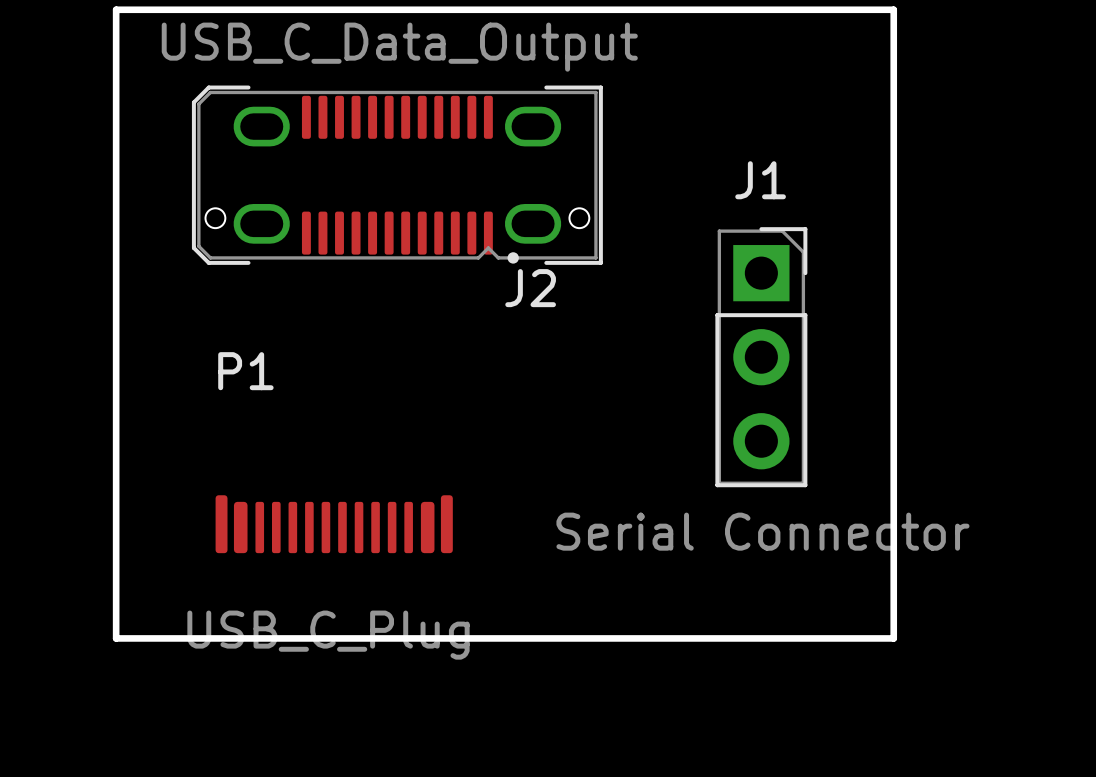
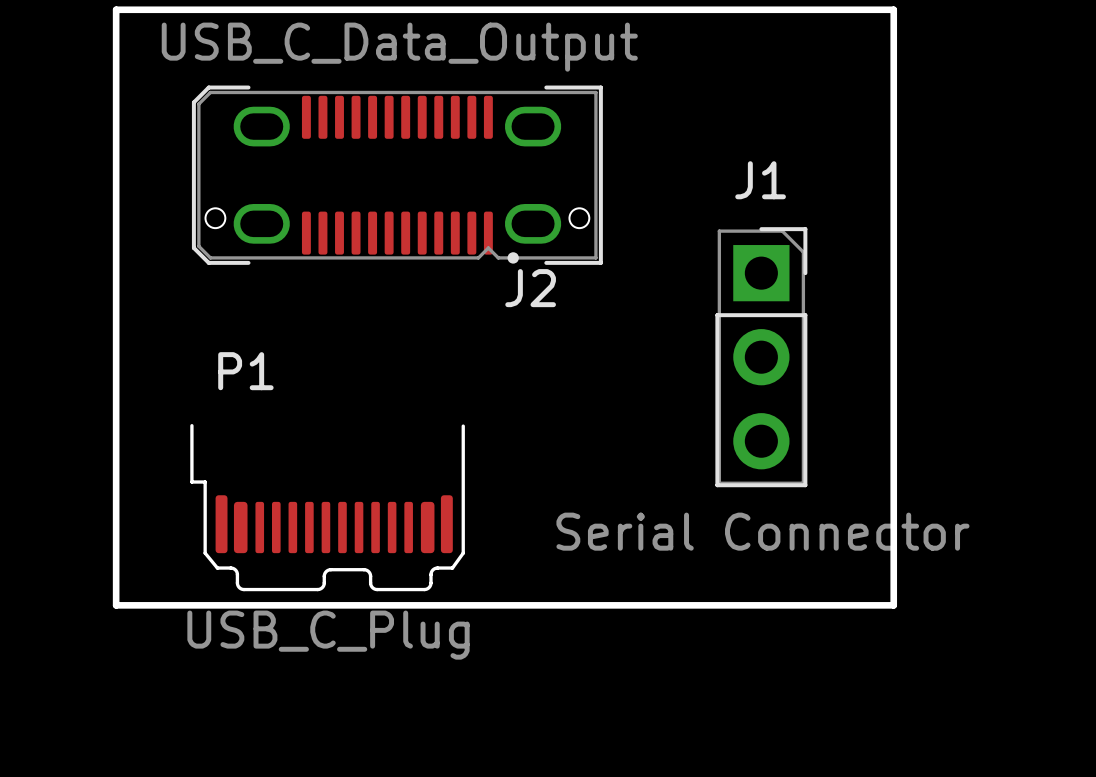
P1 footprint: [215, 495, 453, 554] -> [190, 424, 465, 592]
board edge: (116, 605) (116, 638) (893, 638) (893, 605) -> (116, 605) (893, 605)

